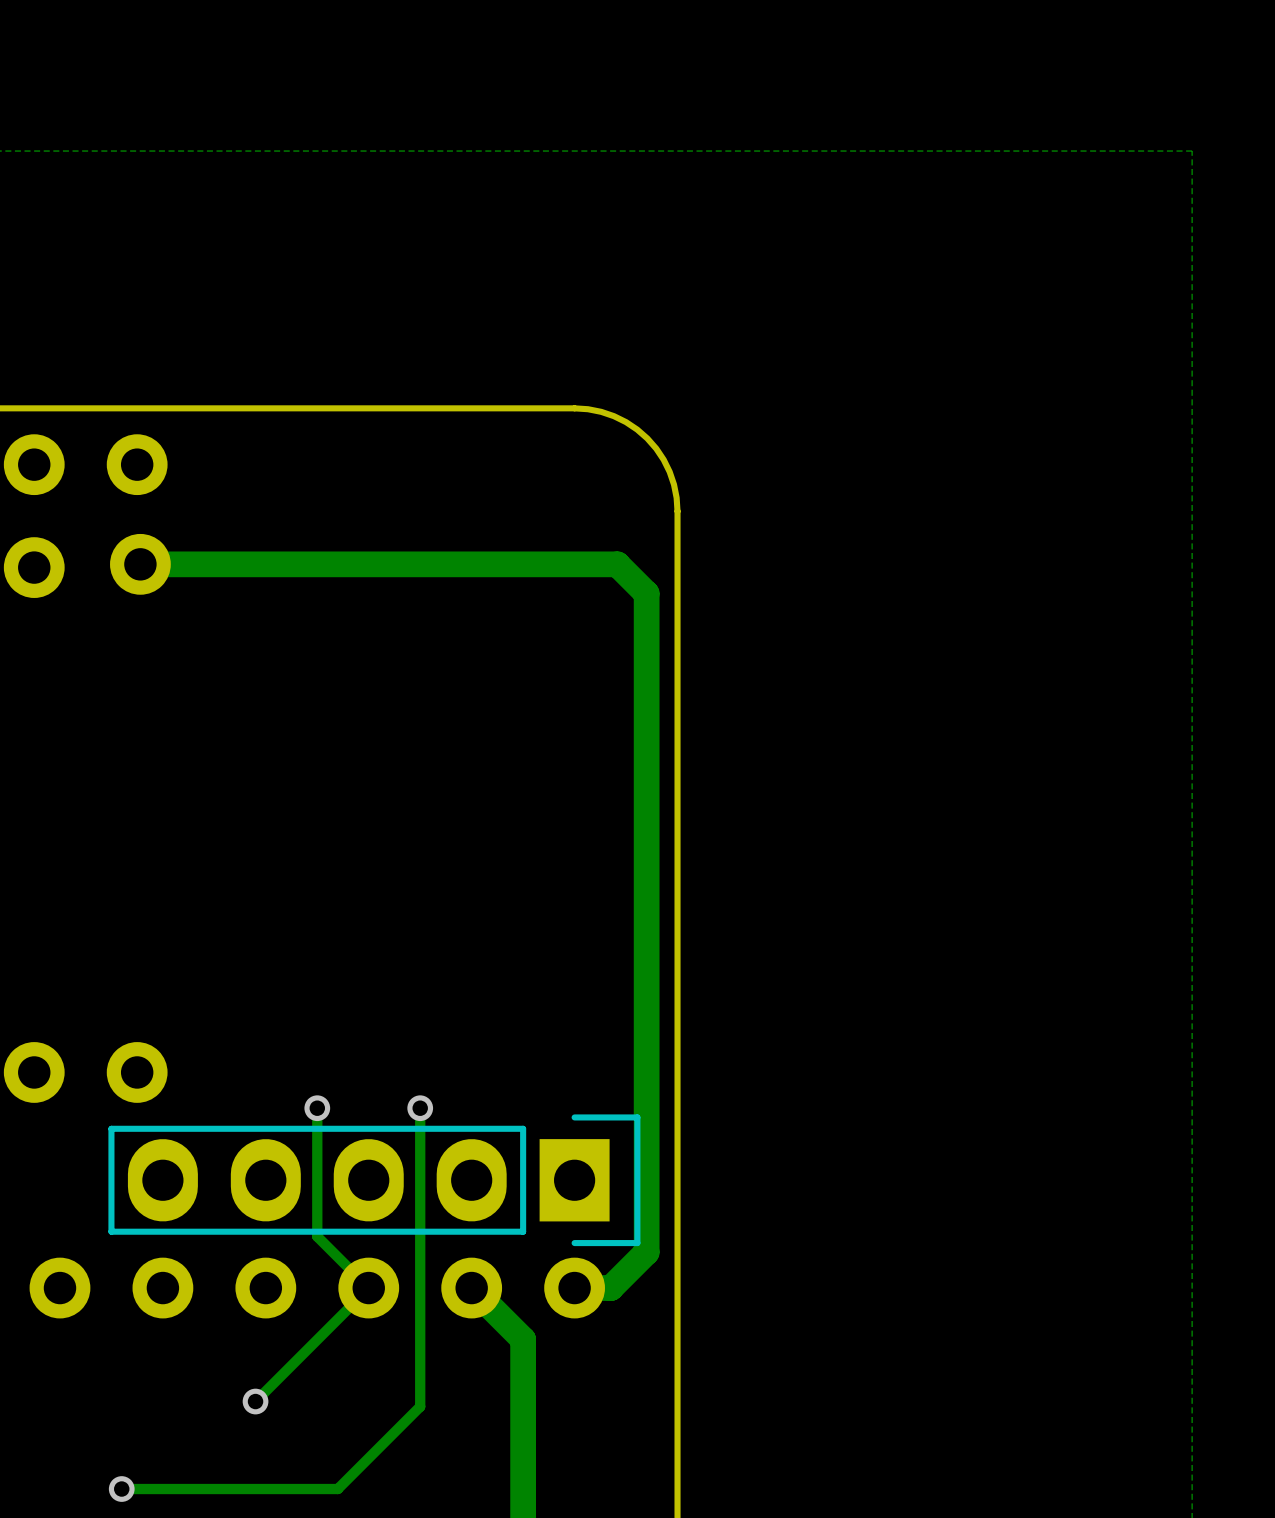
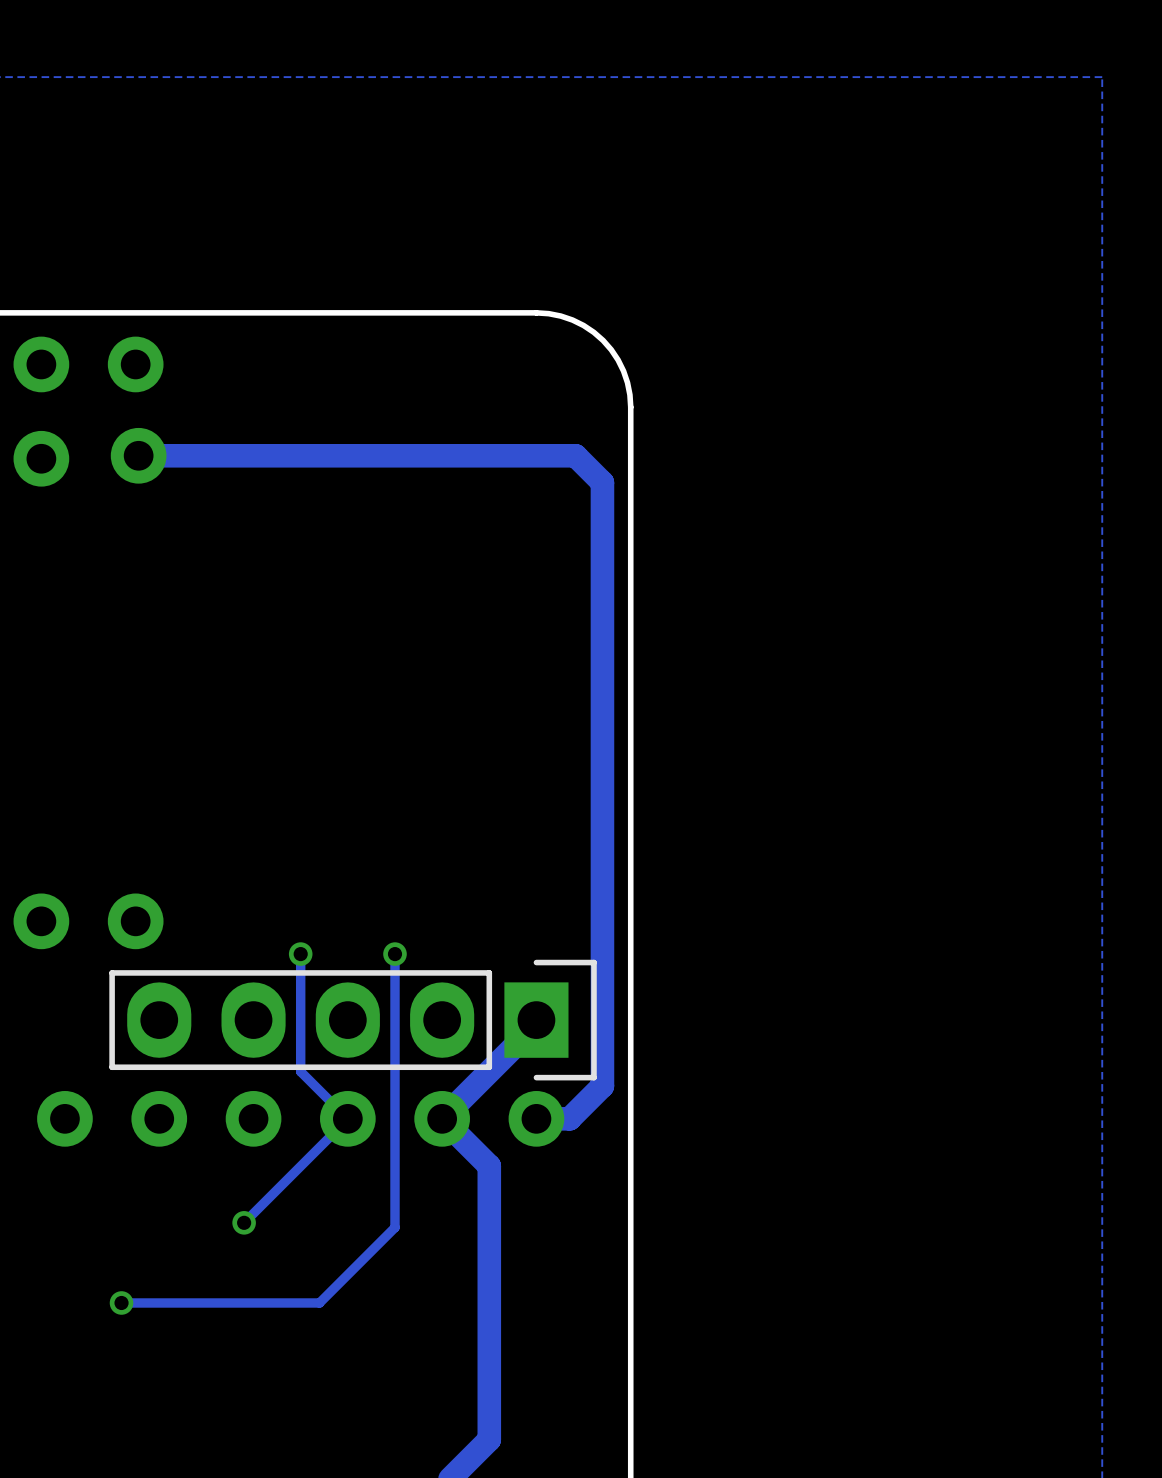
track: none -> (536, 1024) (442, 1118)

